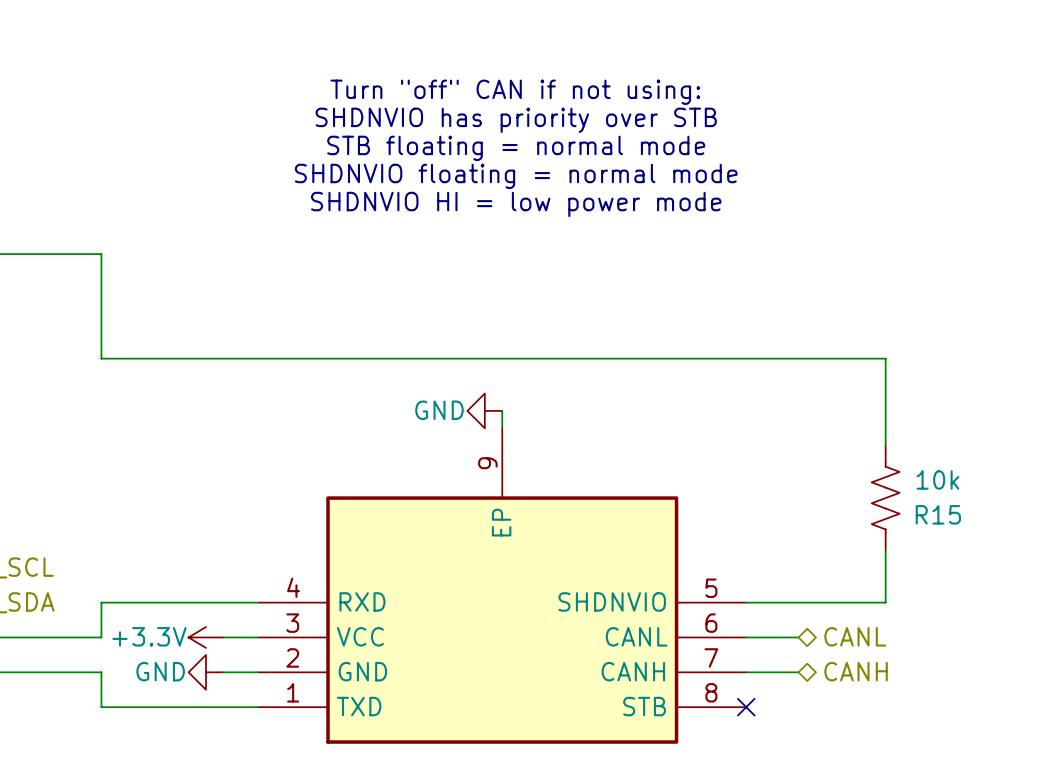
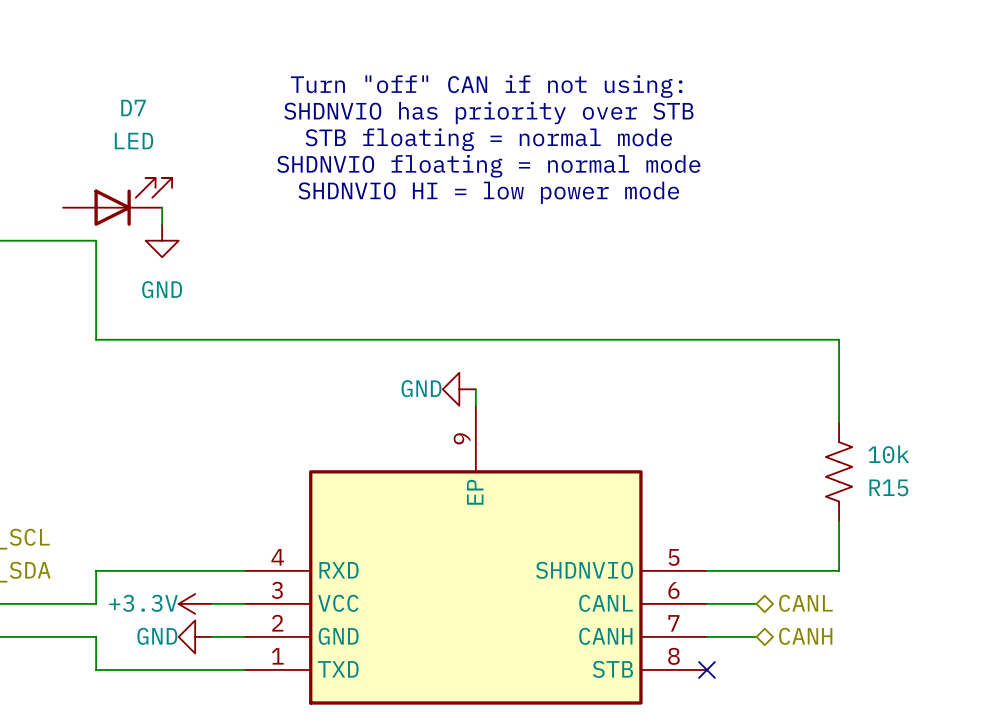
D7: none -> LED (117, 201)
wire: none -> (162, 207) (162, 224)
power symbol: none -> GND (162, 240)

